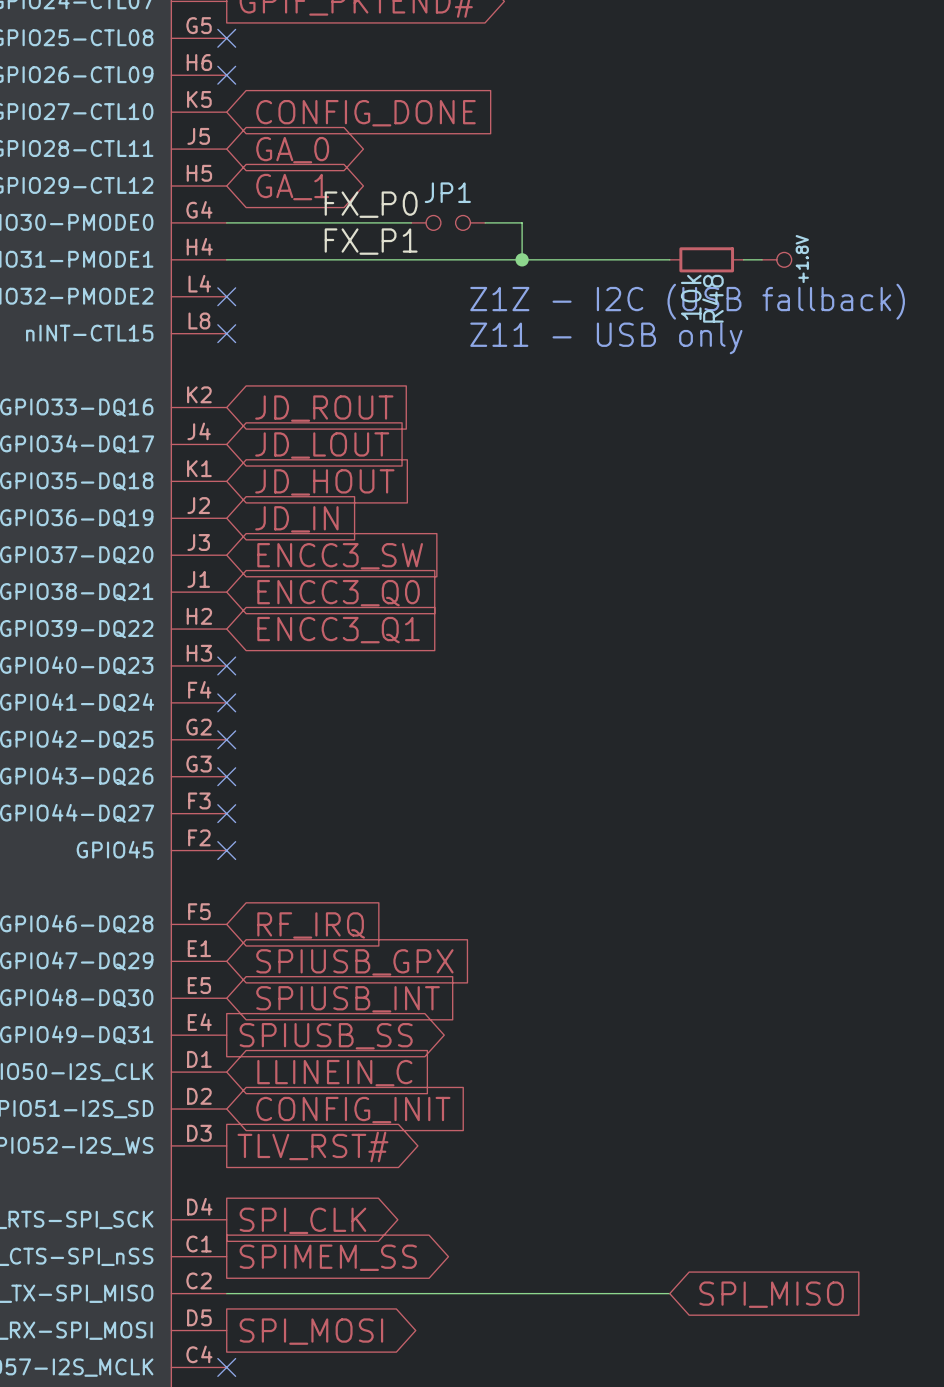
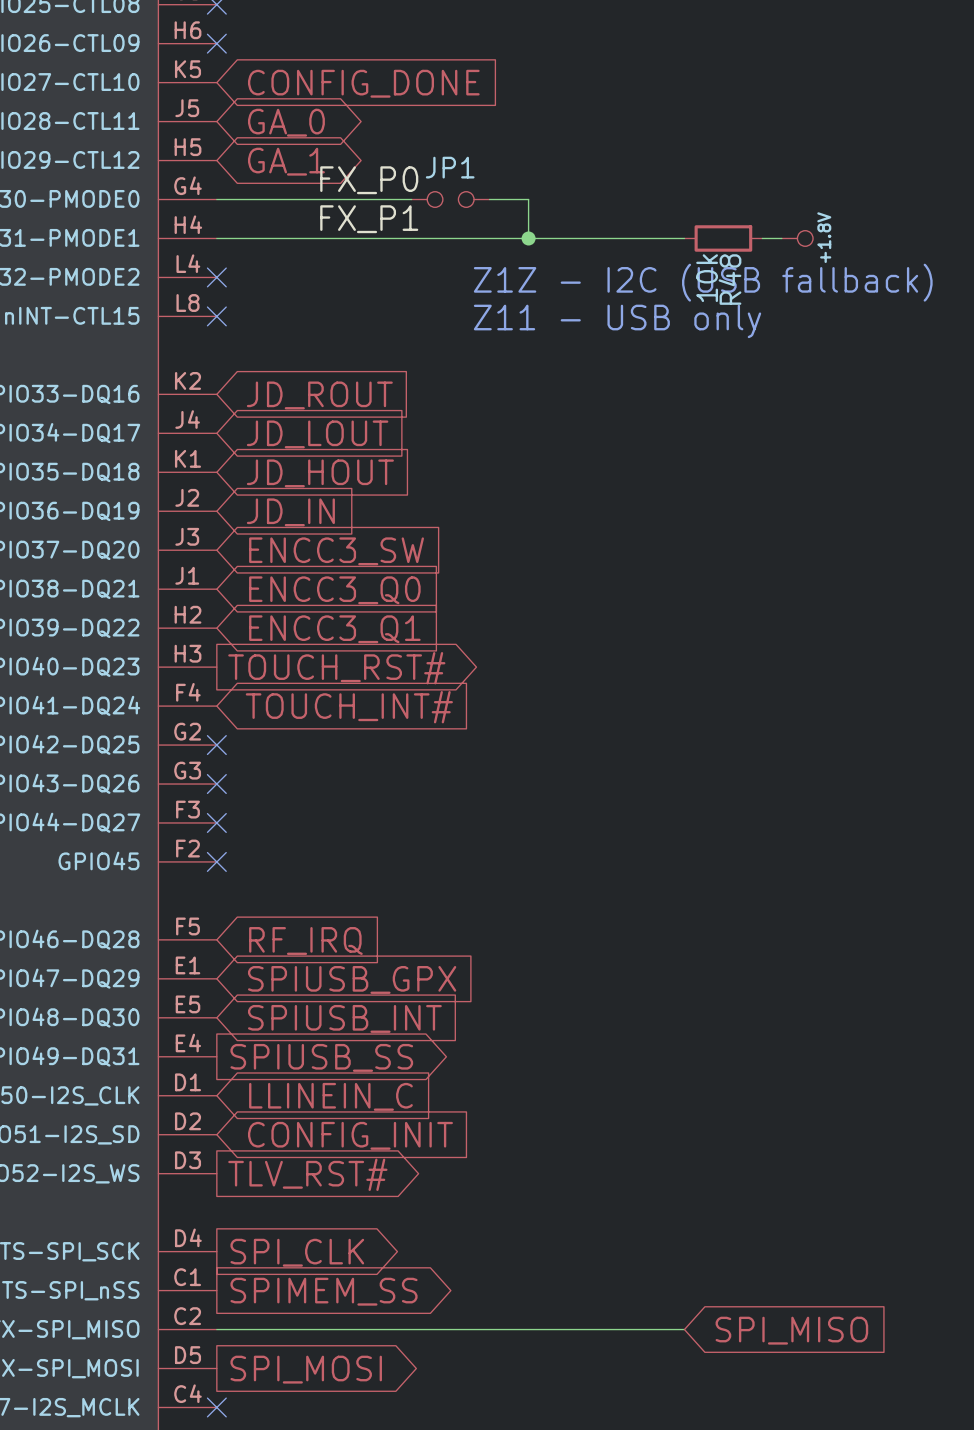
no-connect mark: (226, 665) -> none
global label: none -> TOUCH_RST# (336, 668)
no-connect mark: (226, 702) -> none
global label: none -> TOUCH_INT# (349, 707)

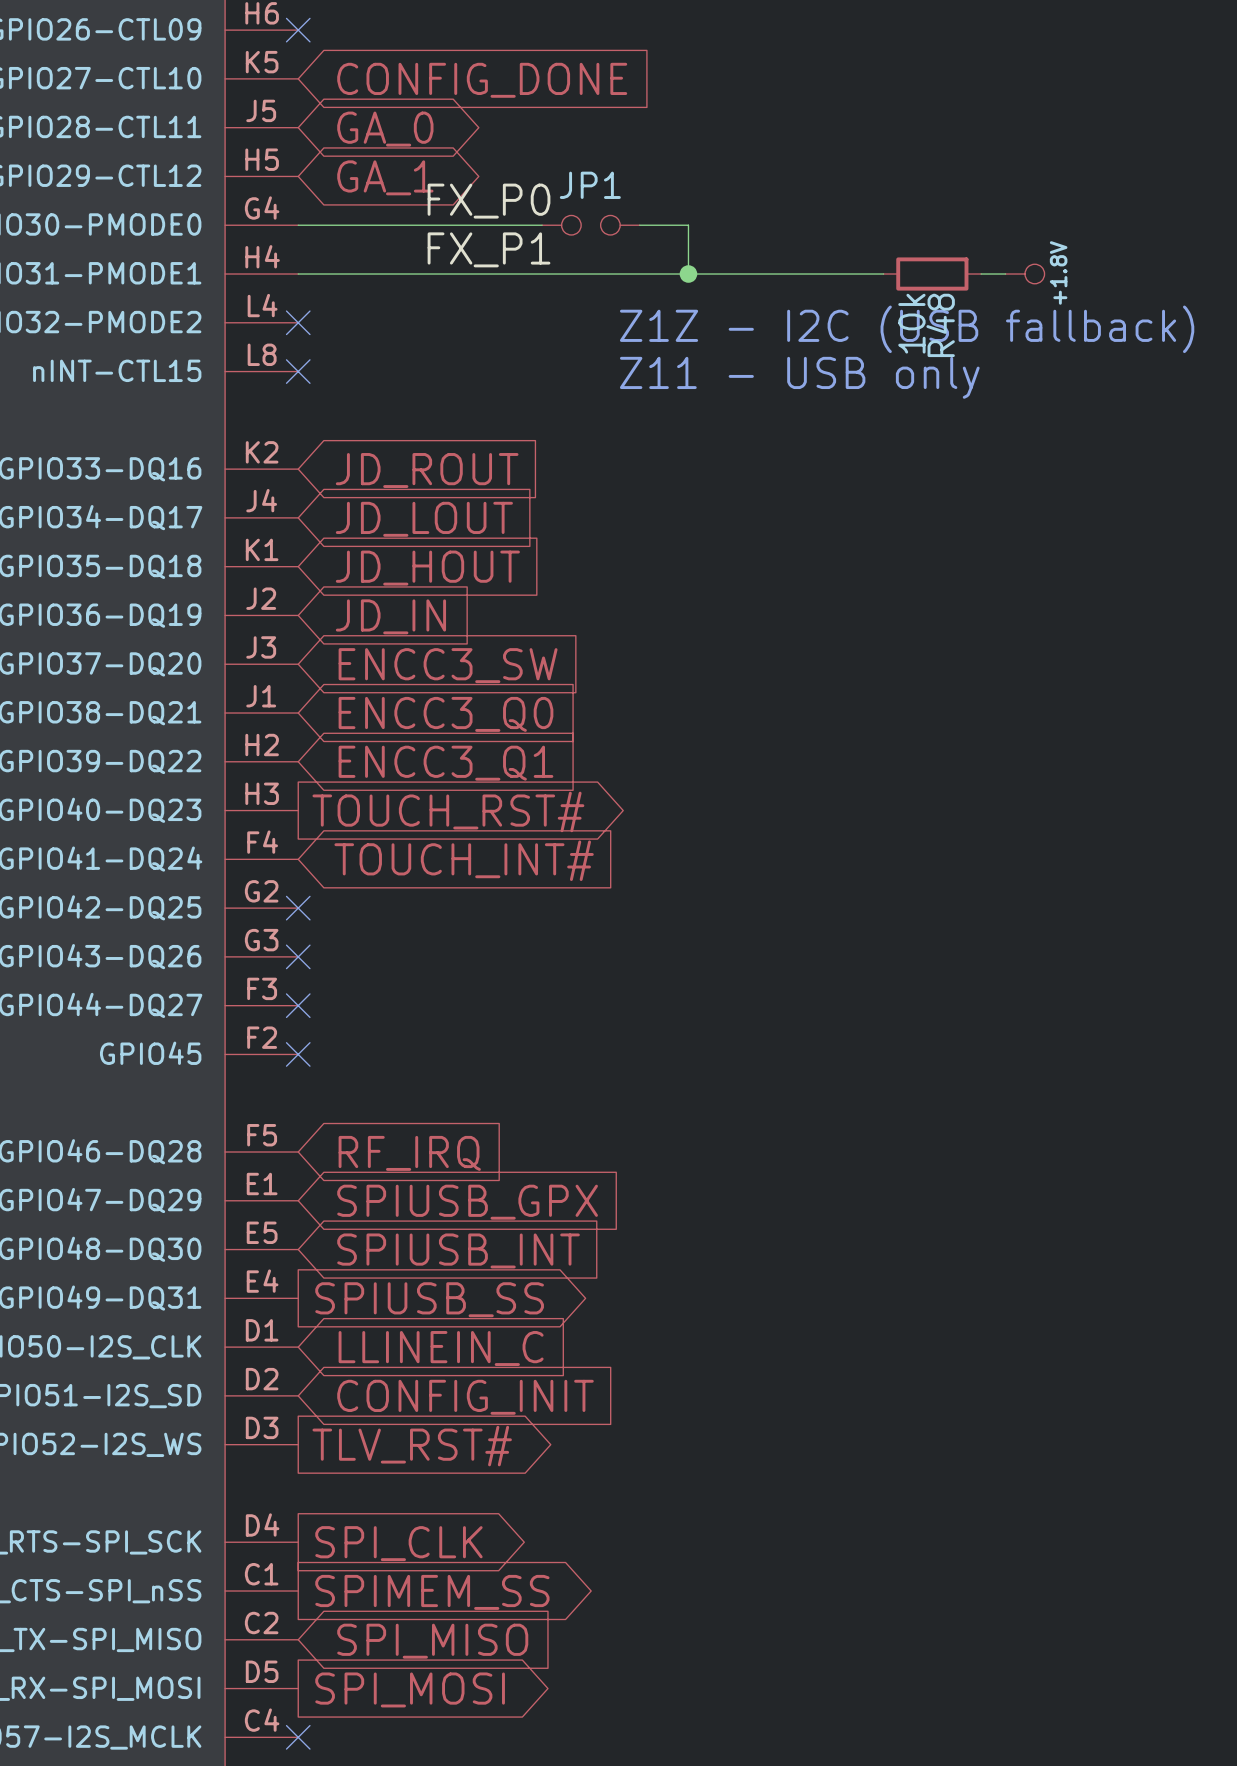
wire: (216, 1329) (684, 1329) -> none
global label: none -> SPI_MISO (432, 1641)
global label: SPI_MISO (791, 1330) -> none

